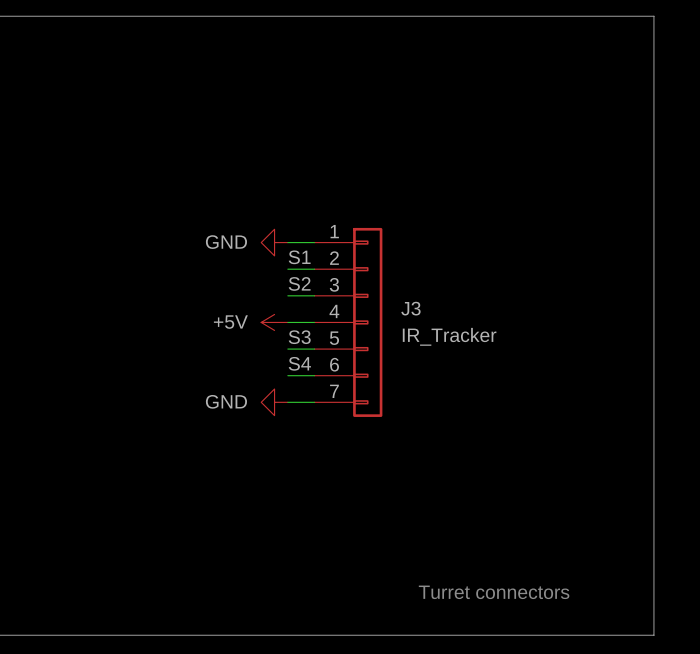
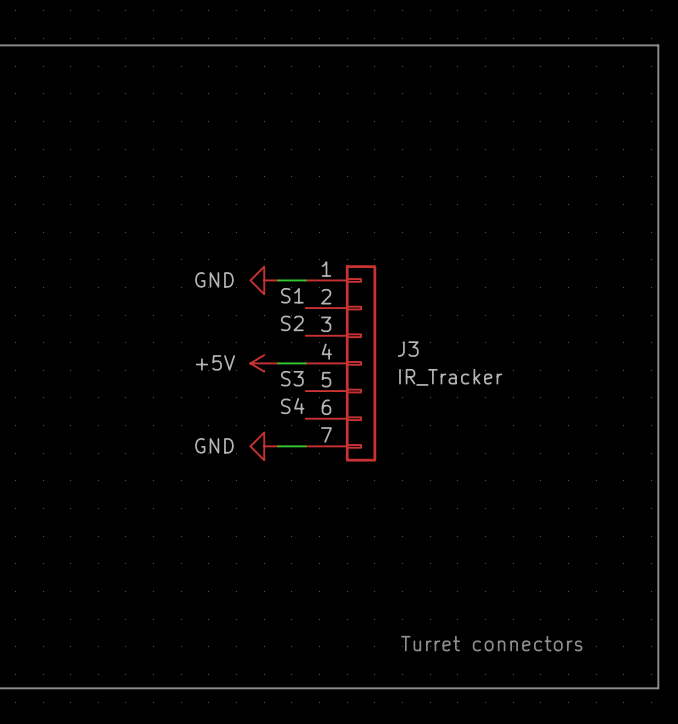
wire: (287, 269) (314, 269) -> none
wire: (287, 295) (314, 295) -> none
wire: (287, 349) (314, 349) -> none
wire: (287, 375) (314, 375) -> none

